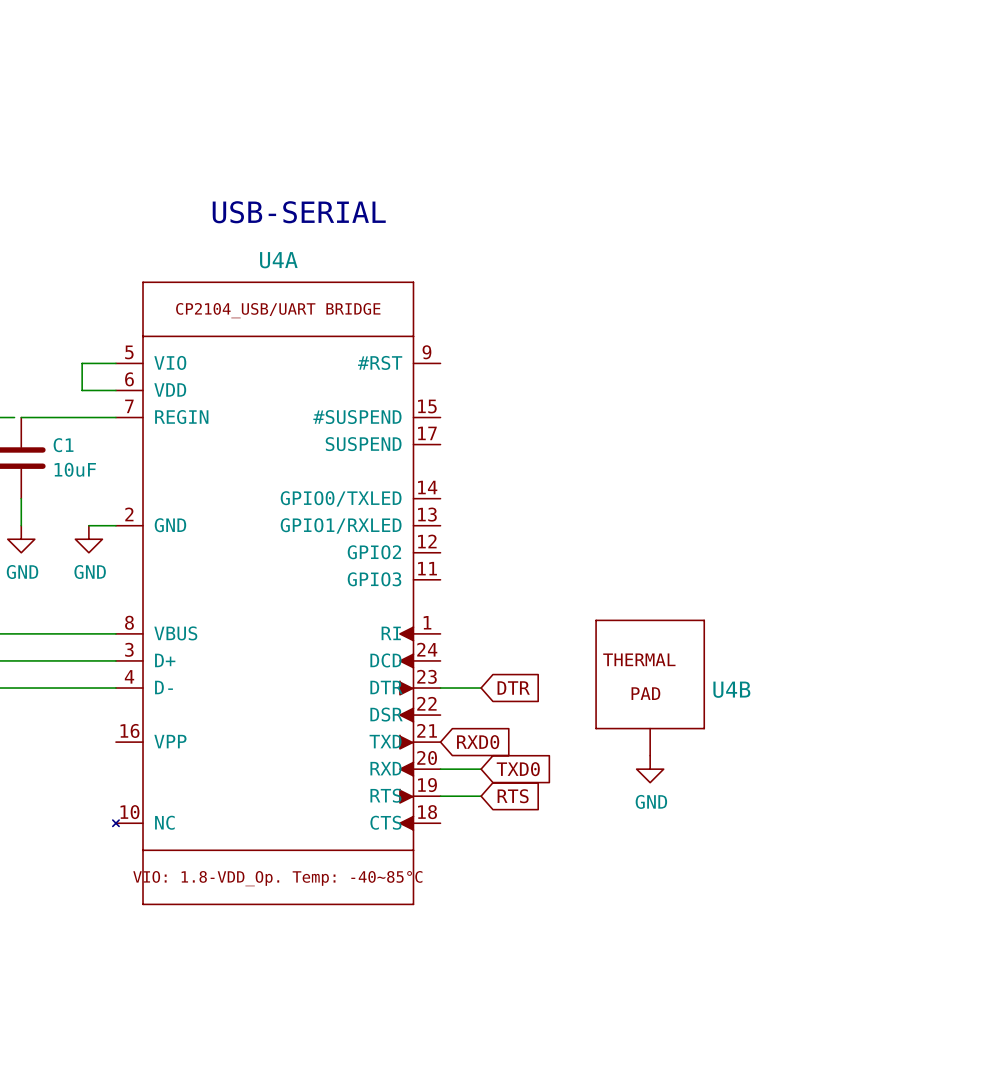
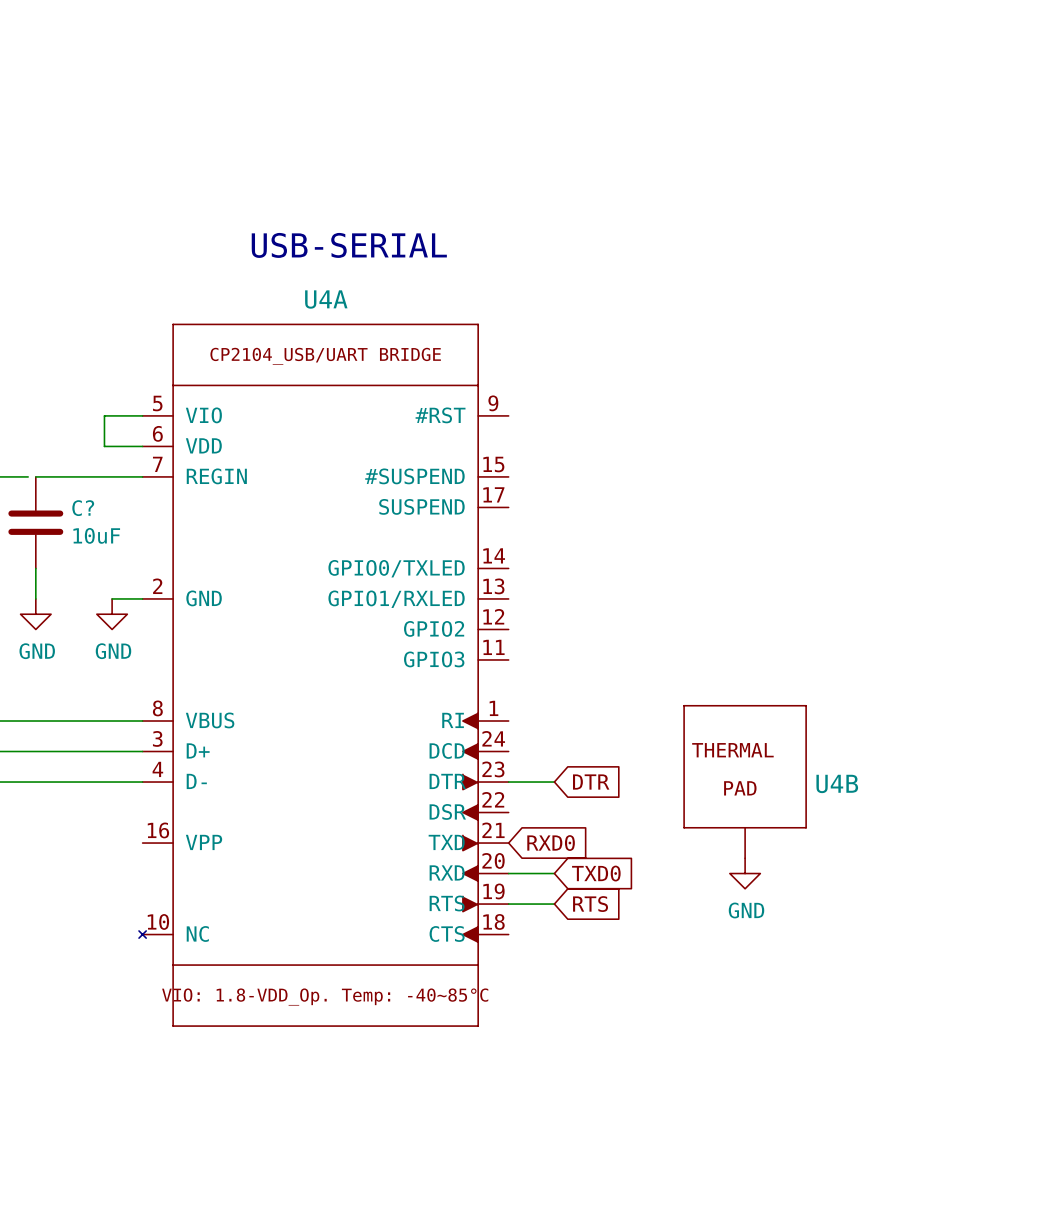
C1 name: C1 (63, 445) -> C? (83, 508)

